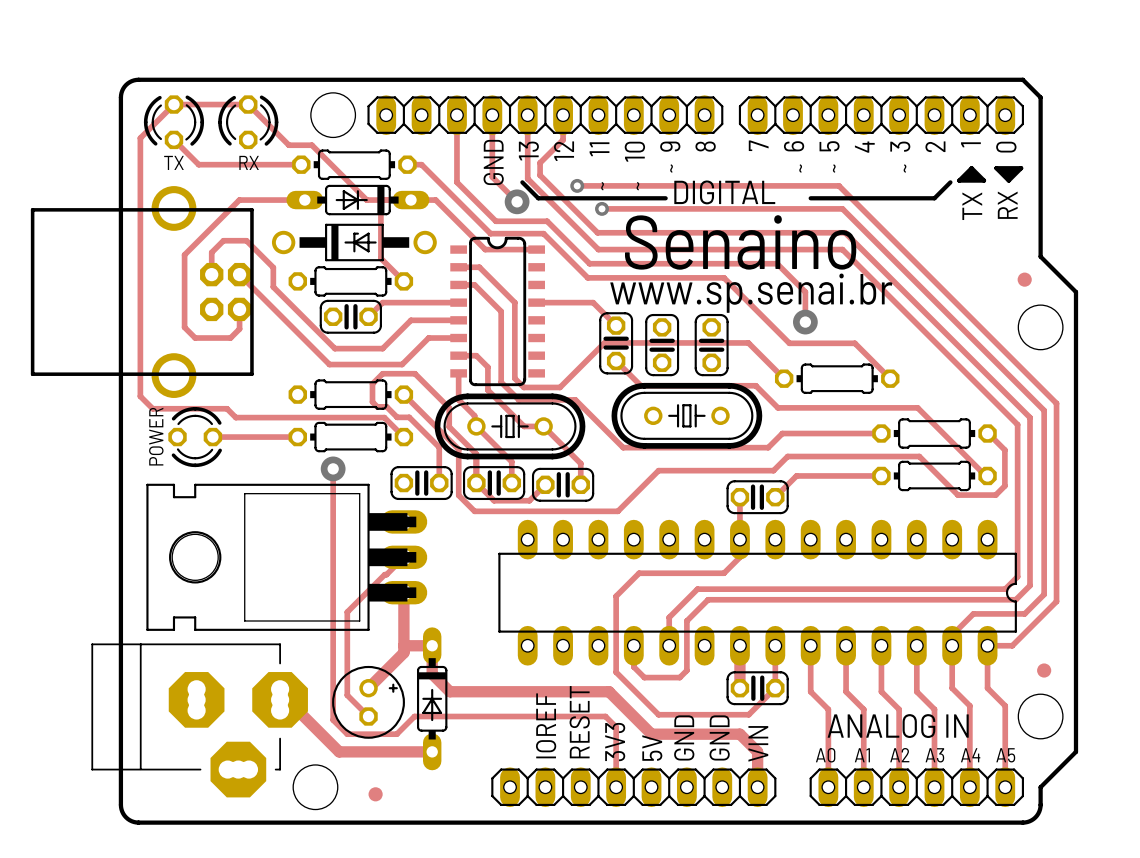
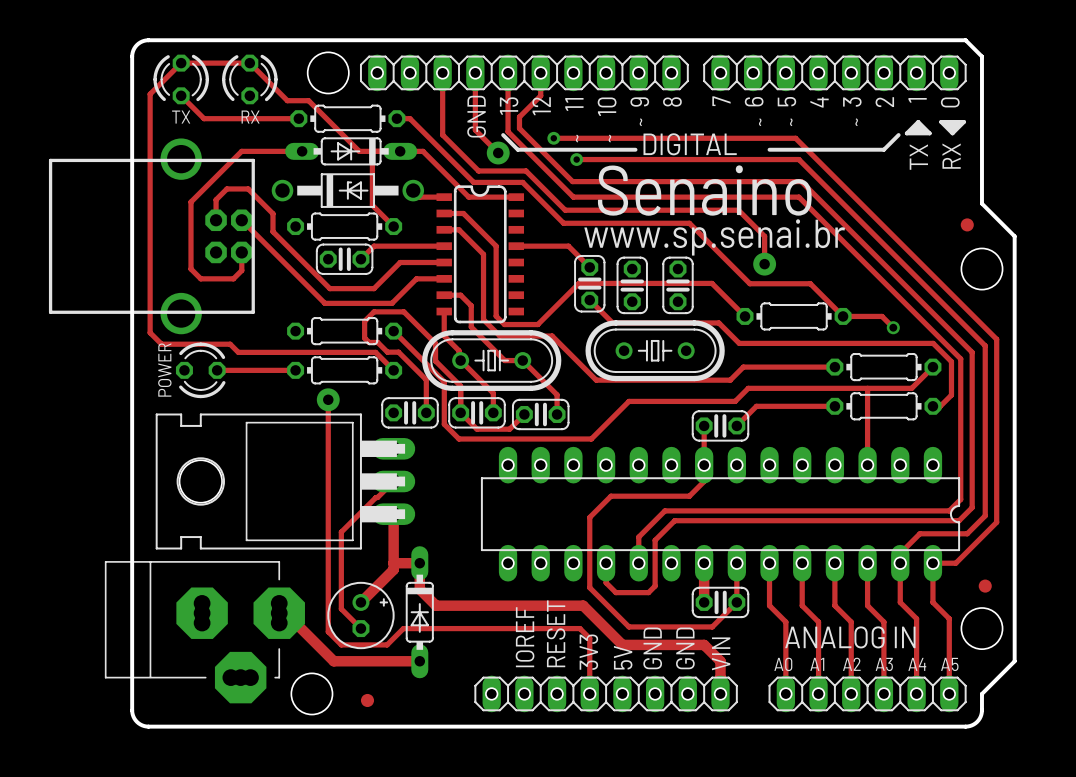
track: none -> (413, 190) (419, 197) (444, 197)
track: none -> (843, 316) (882, 316) (893, 327)
via: none -> (893, 327)
track: (917, 407) (987, 475) -> (868, 343) (933, 343) (951, 361) (951, 395) (940, 406) (932, 406)
track: (988, 433) (1004, 450) (1004, 485) (995, 495) (957, 495) (919, 456) -> (932, 367) (911, 388) (869, 388)
track: none -> (867, 388) (867, 465)

